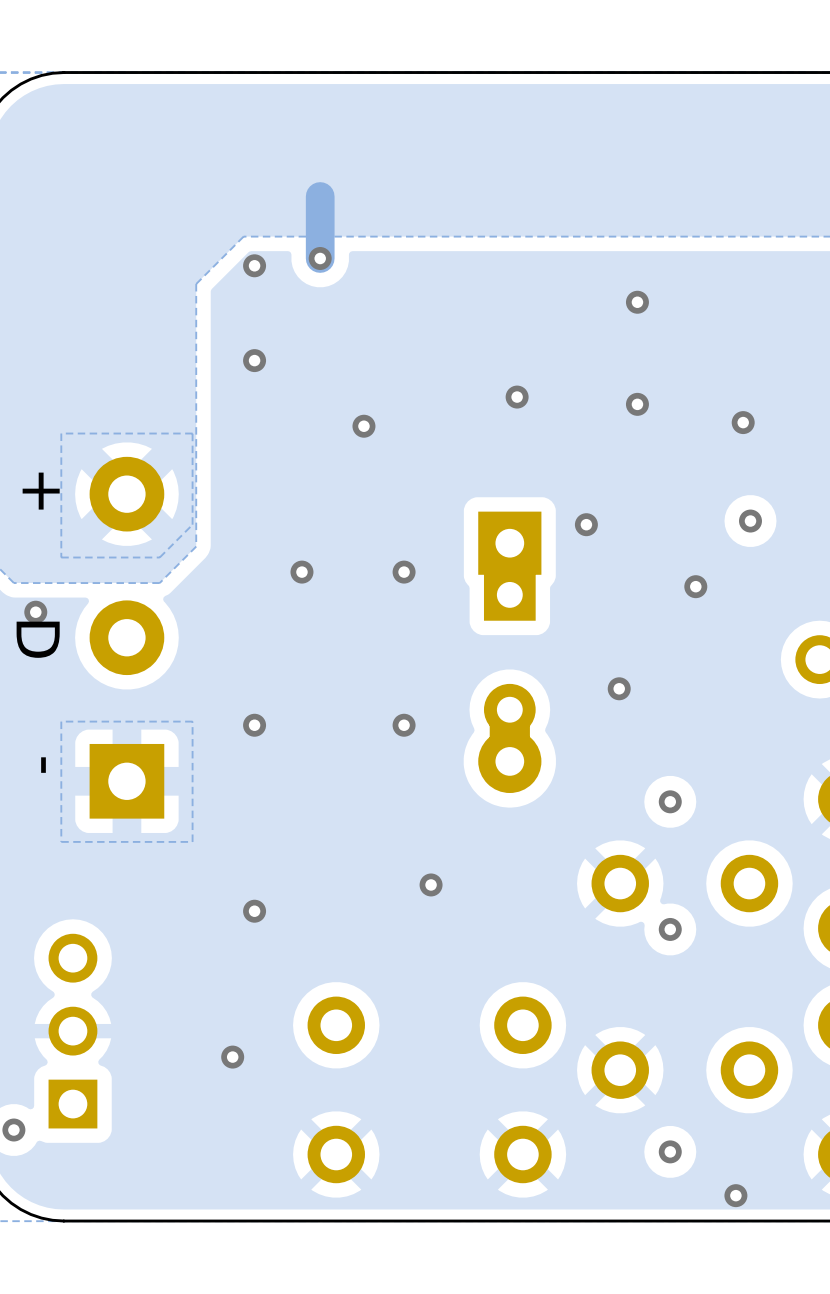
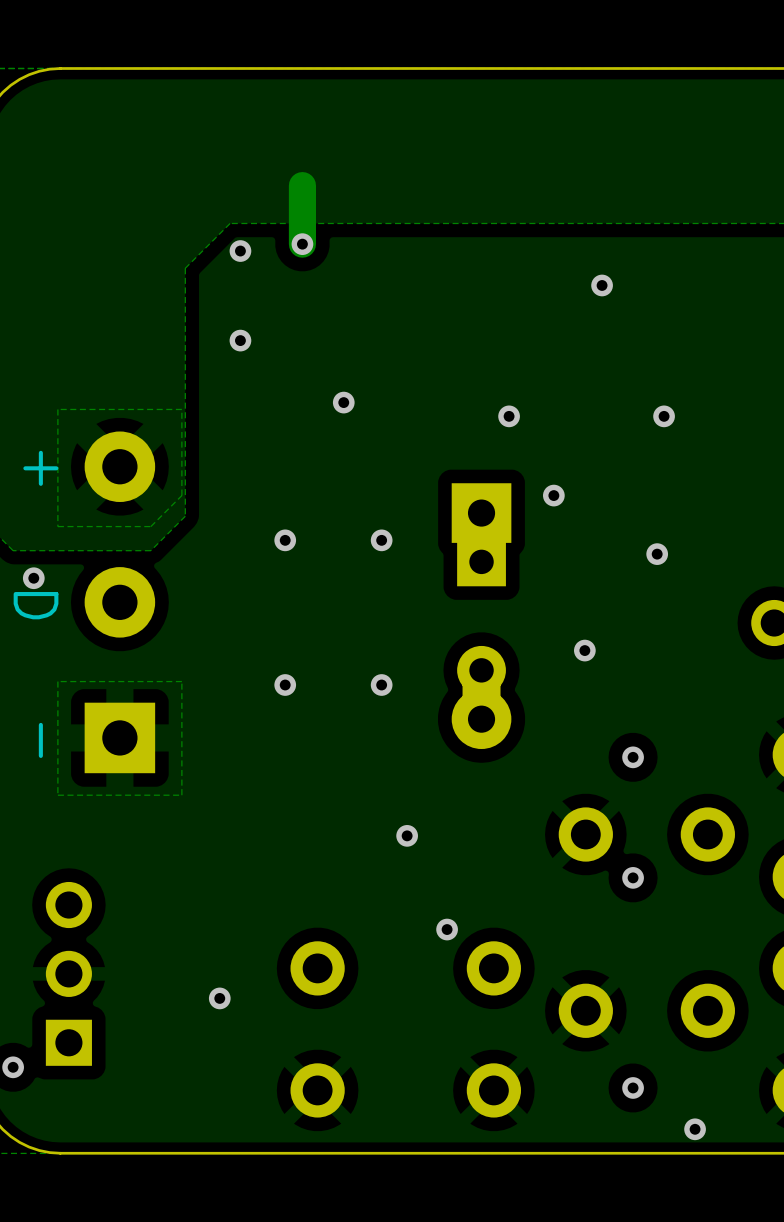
via position: (517, 397) -> (509, 416)
via: (637, 404) -> none
via: (743, 422) -> none
via: none -> (664, 416)
via: (750, 521) -> none
via position: (254, 725) -> (285, 685)
via: (254, 911) -> none
via: none -> (447, 929)

